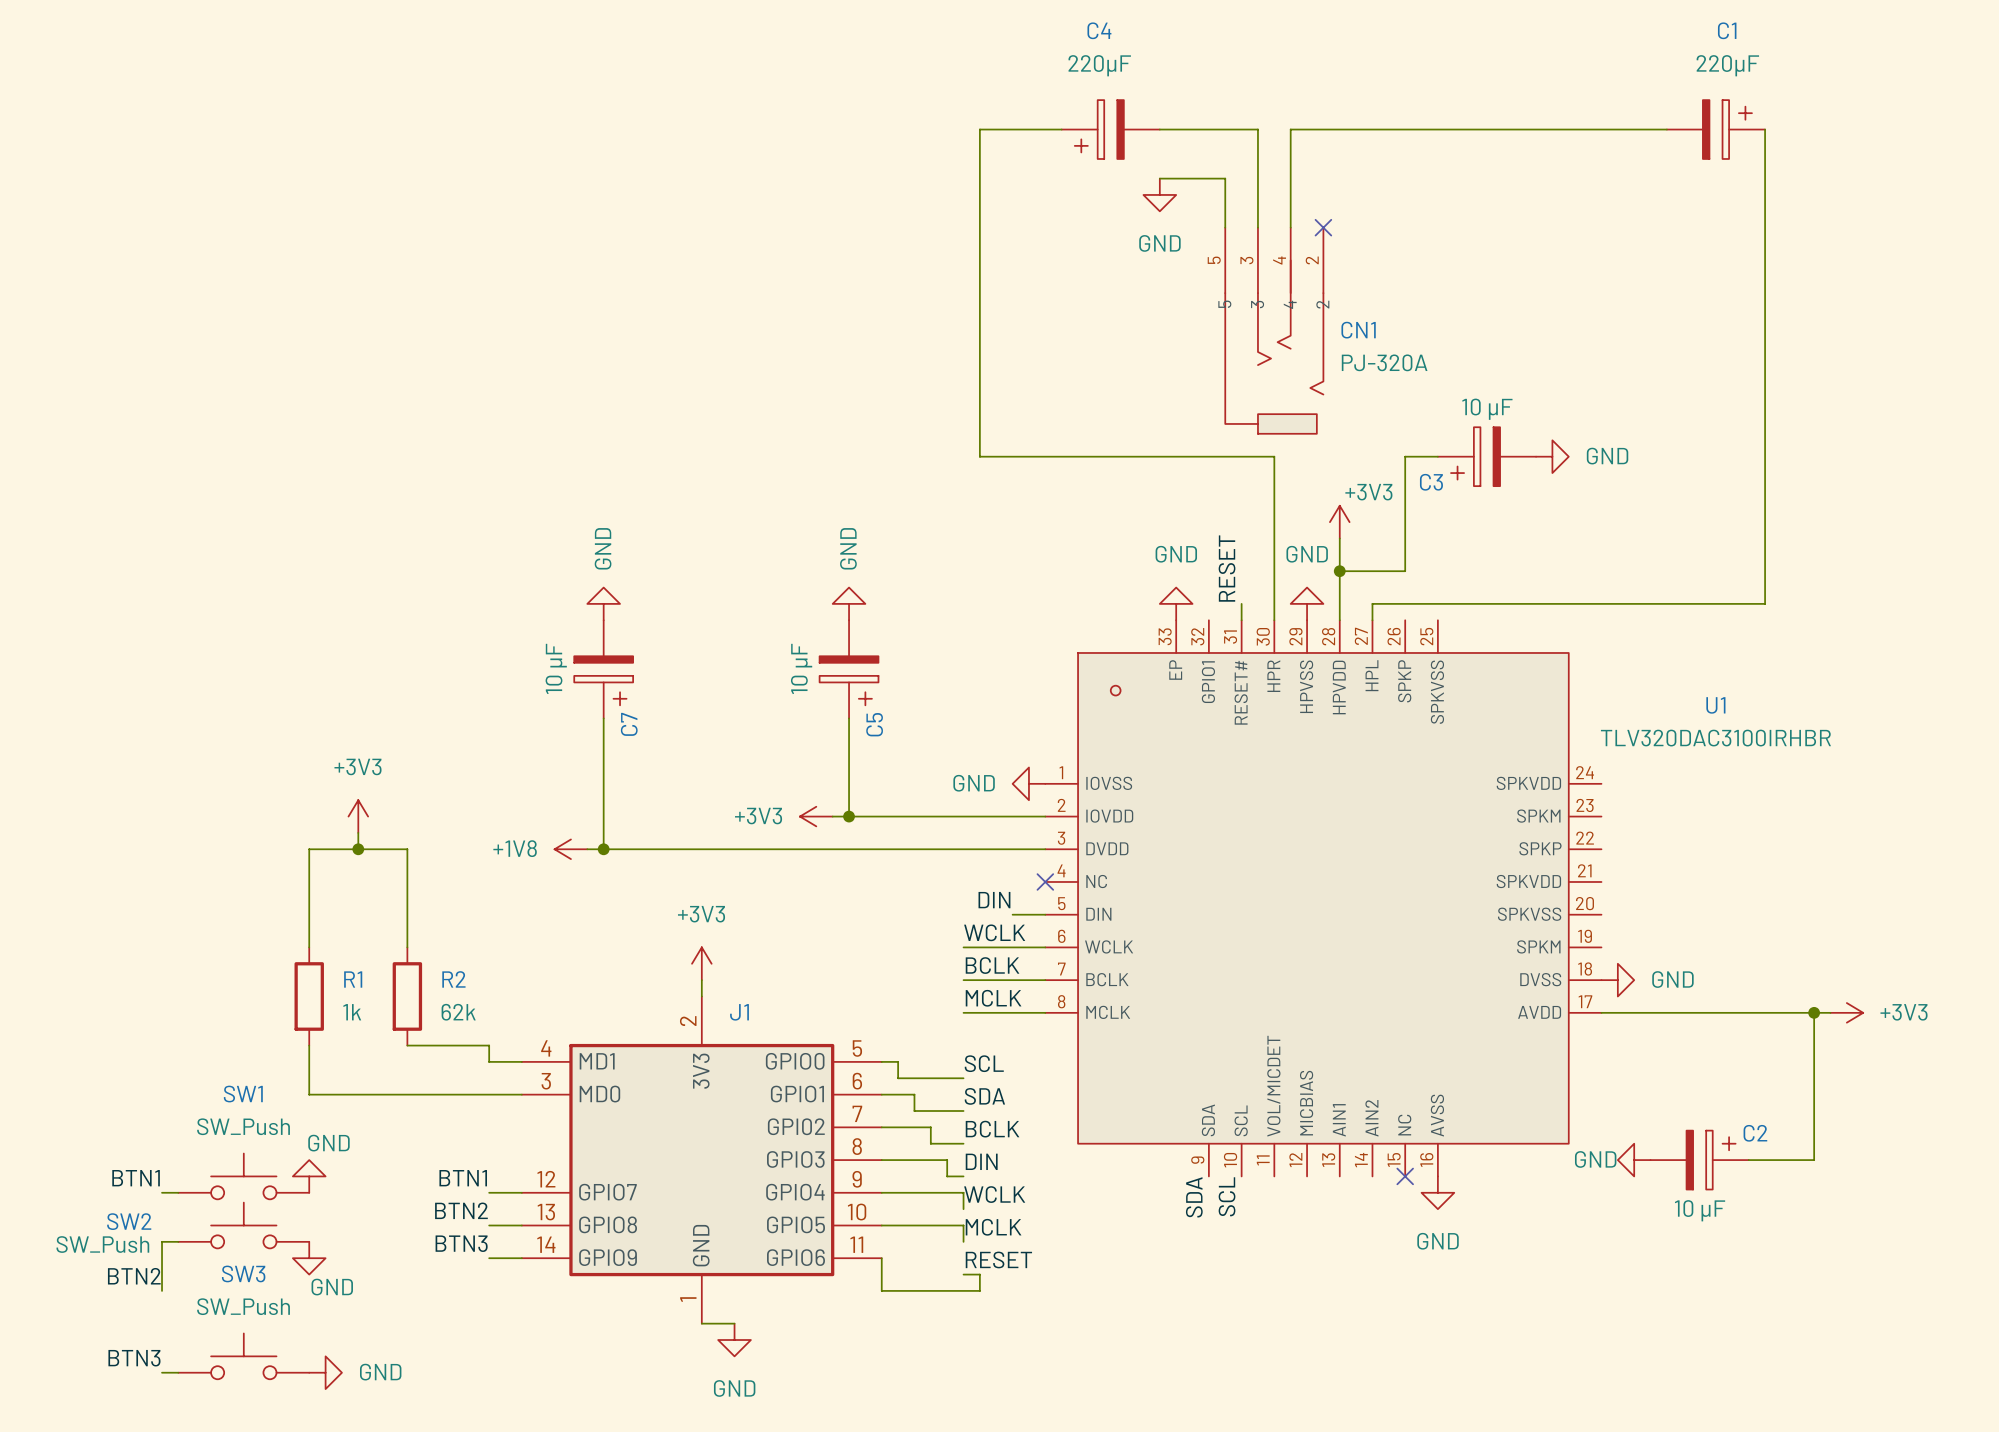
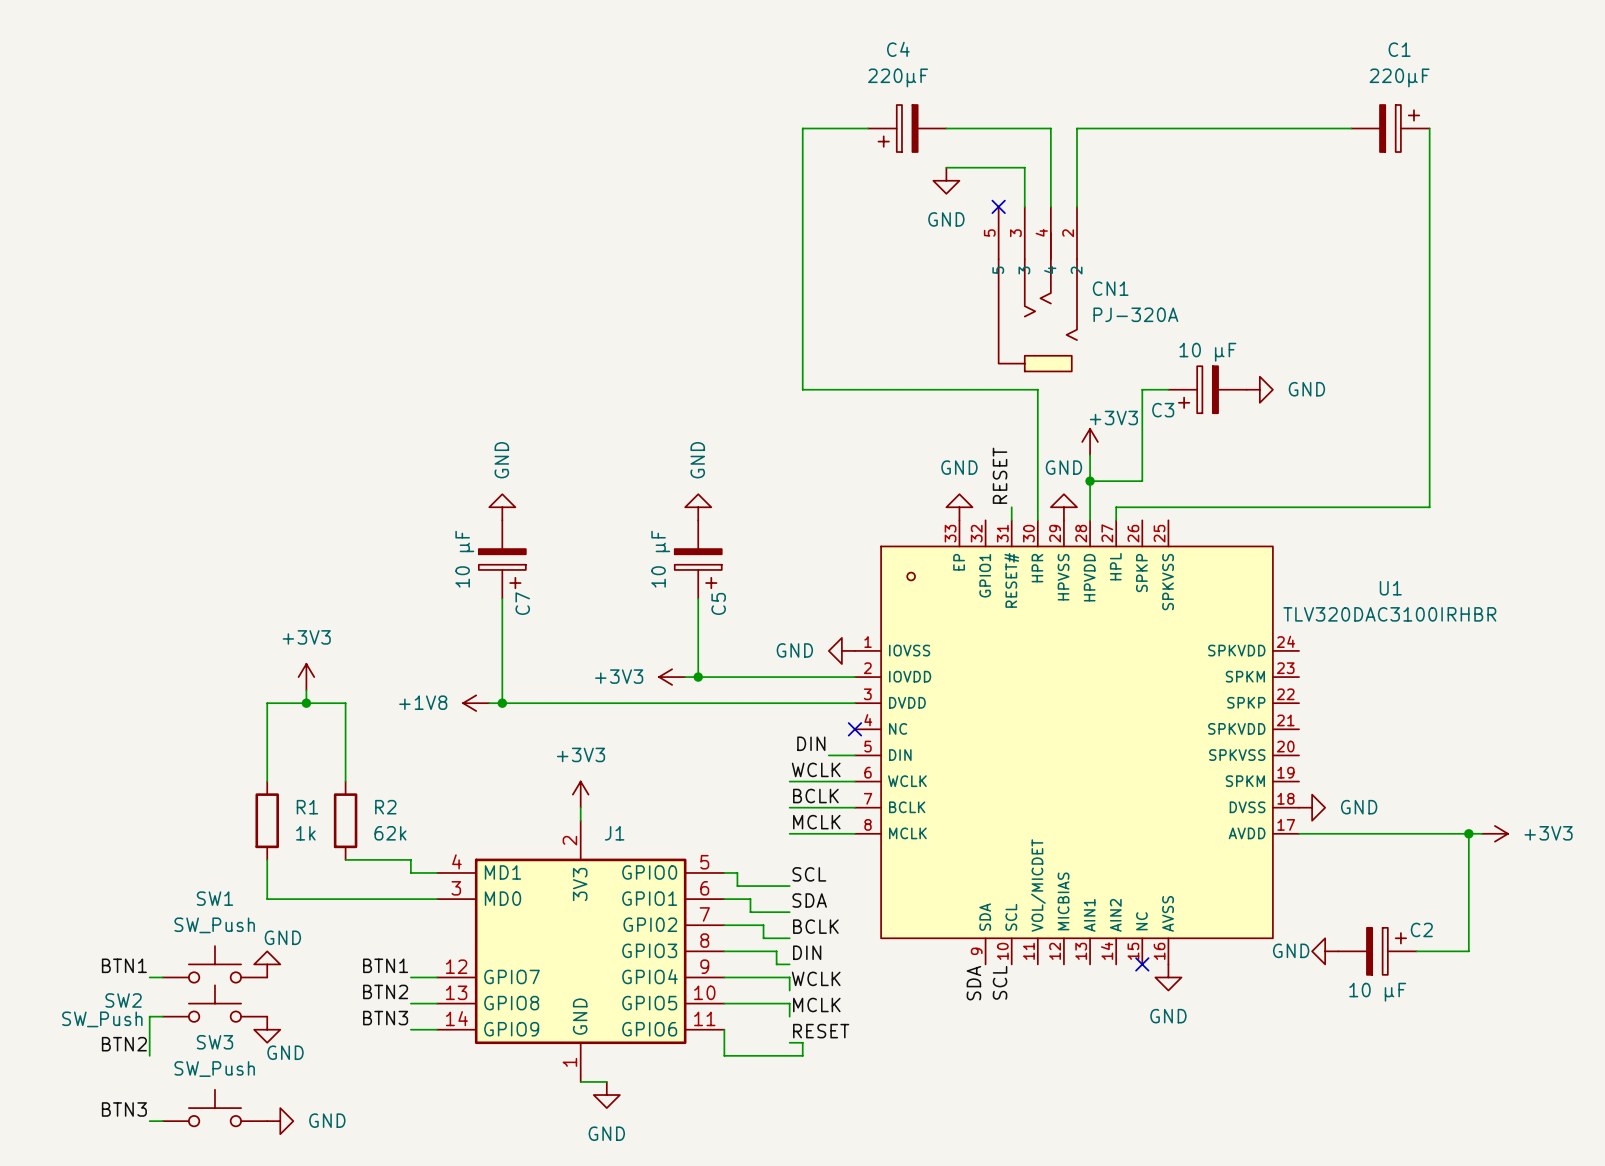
wire: (1257, 129) (1257, 178) -> (1024, 128) (1050, 128)
wire: (1290, 129) (1323, 129) -> (1077, 206) (1077, 128)
wire: (1225, 178) (1225, 227) -> (998, 167) (1024, 167)
no-connect mark: none -> (998, 206)
no-connect mark: (1323, 227) -> none

